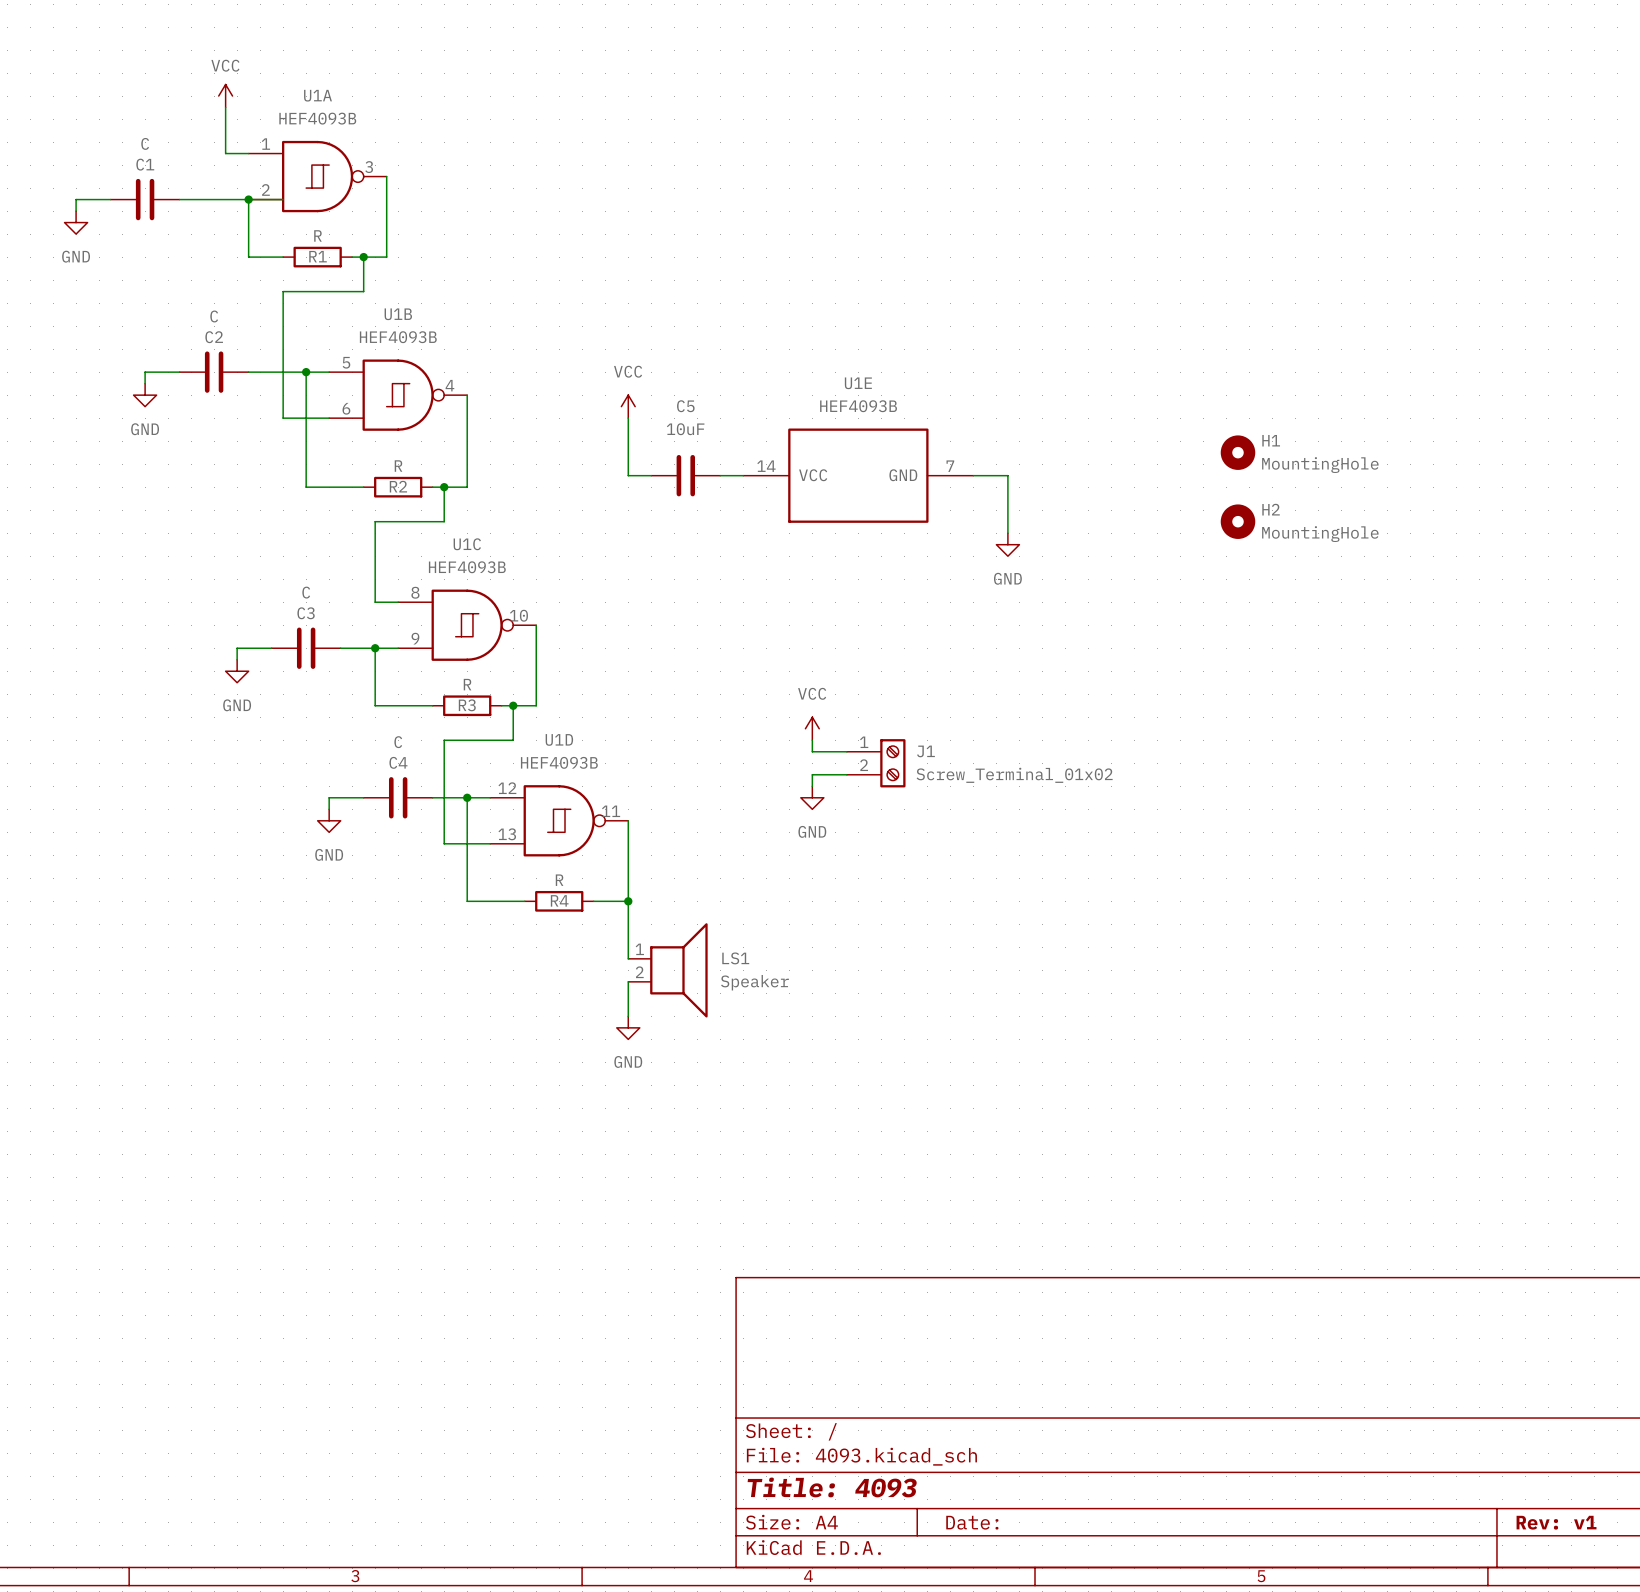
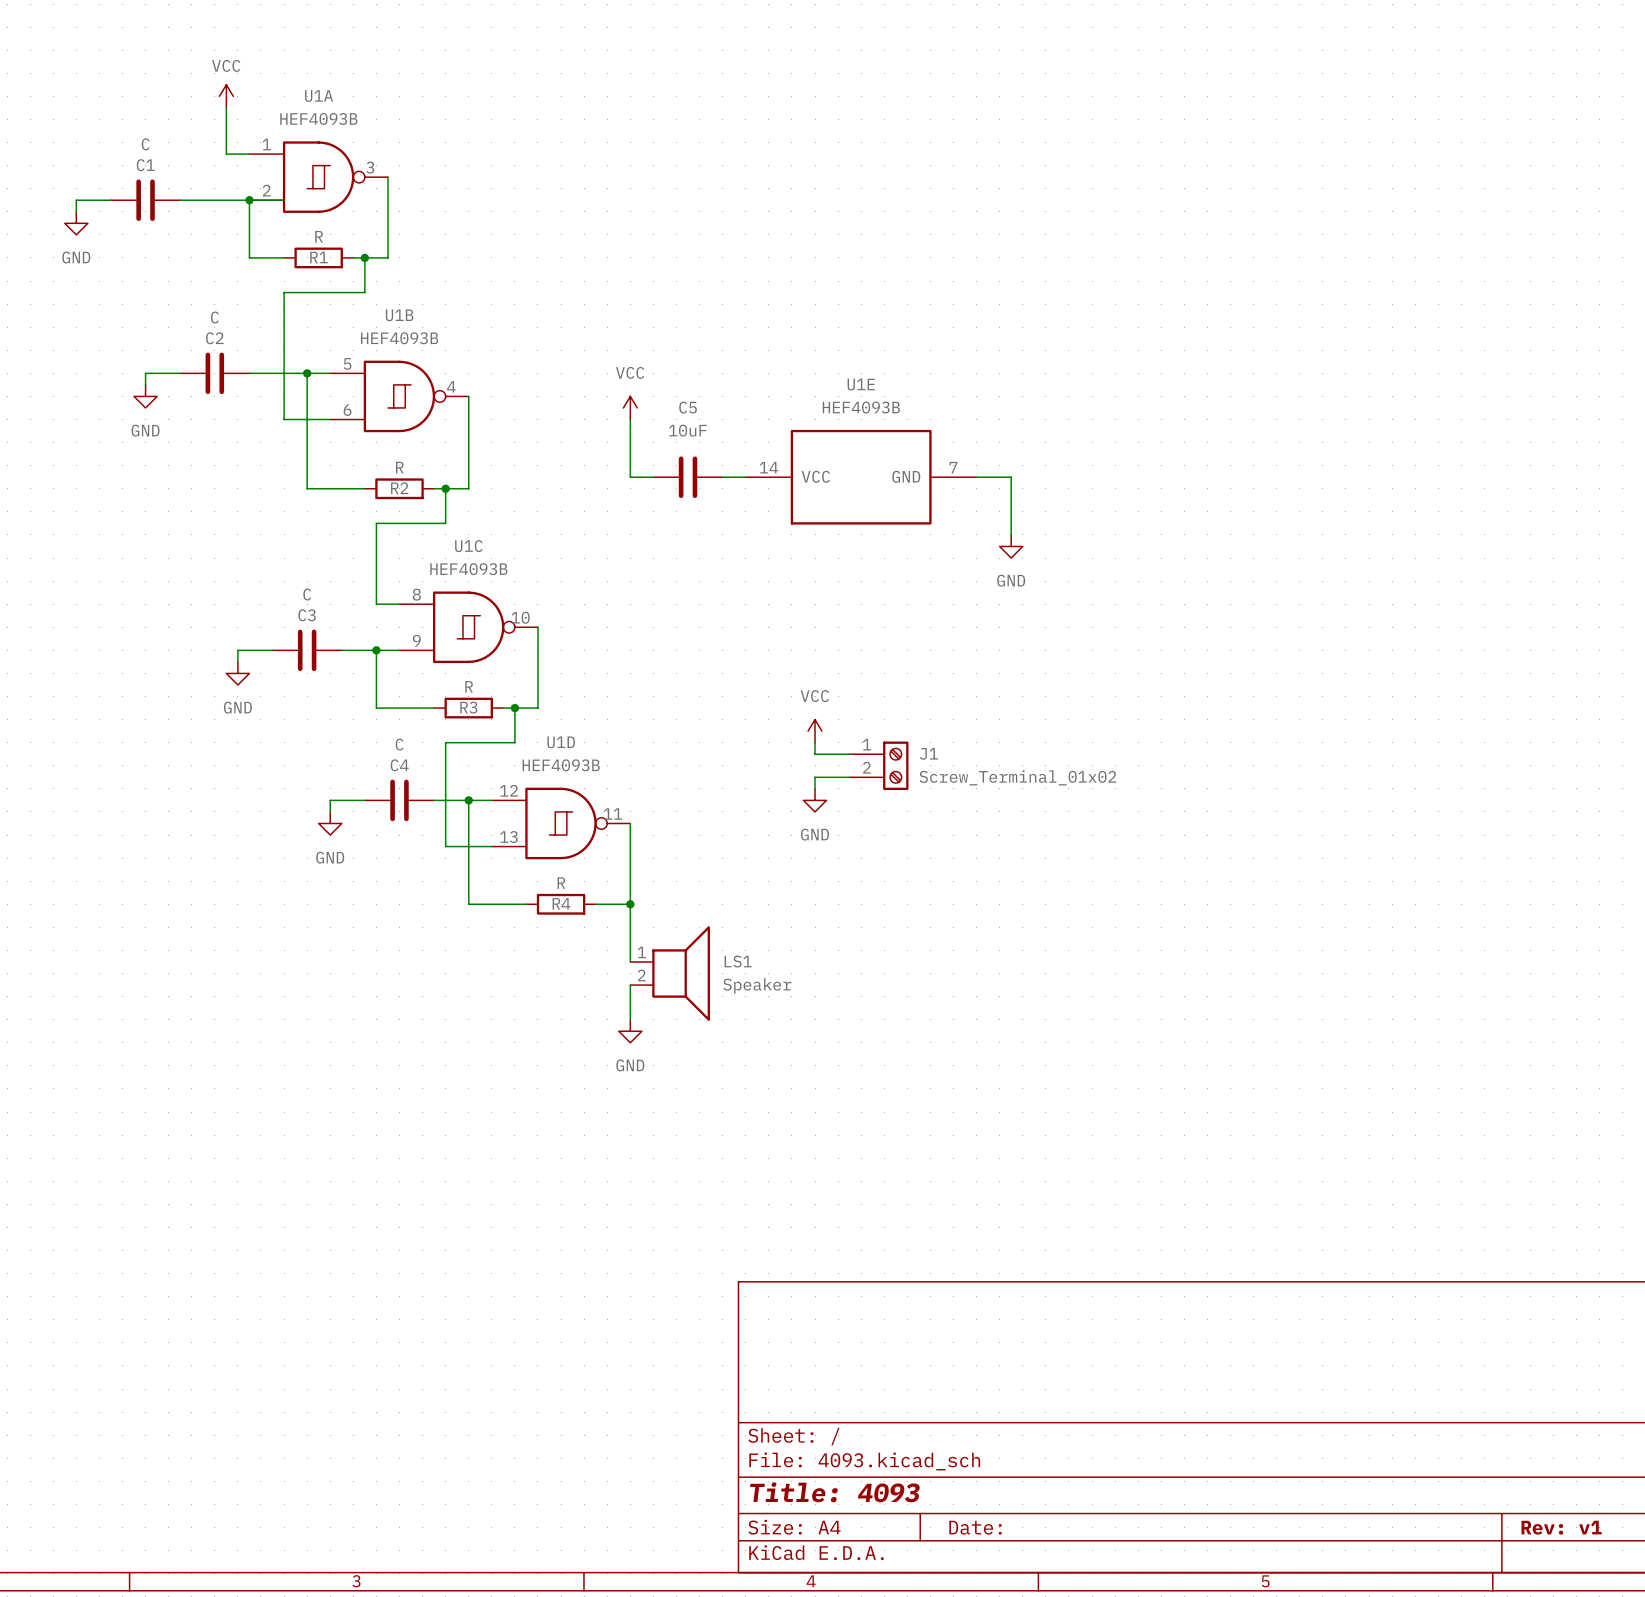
H1: MountingHole (1238, 452) -> none
H2: MountingHole (1238, 521) -> none

